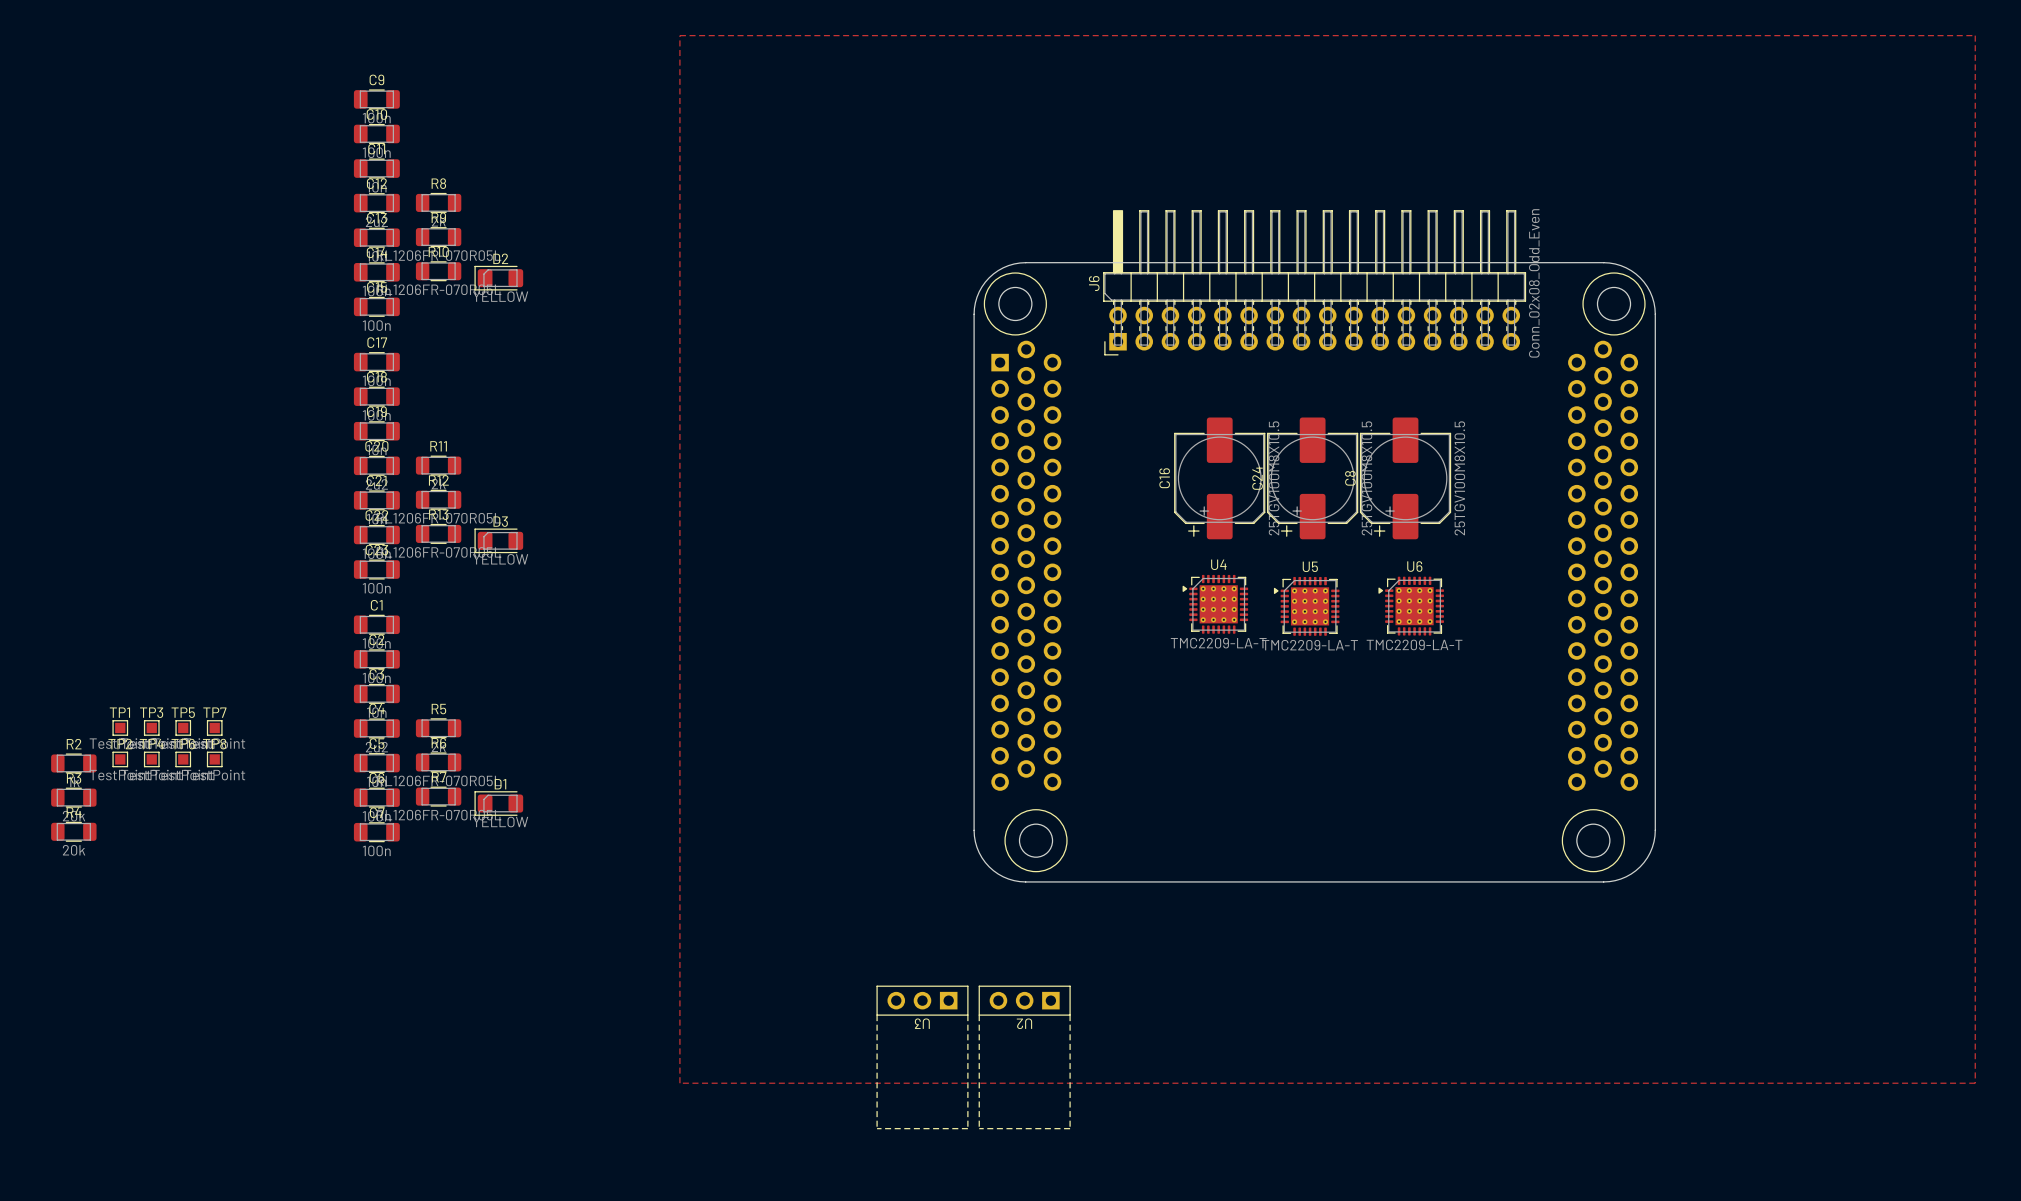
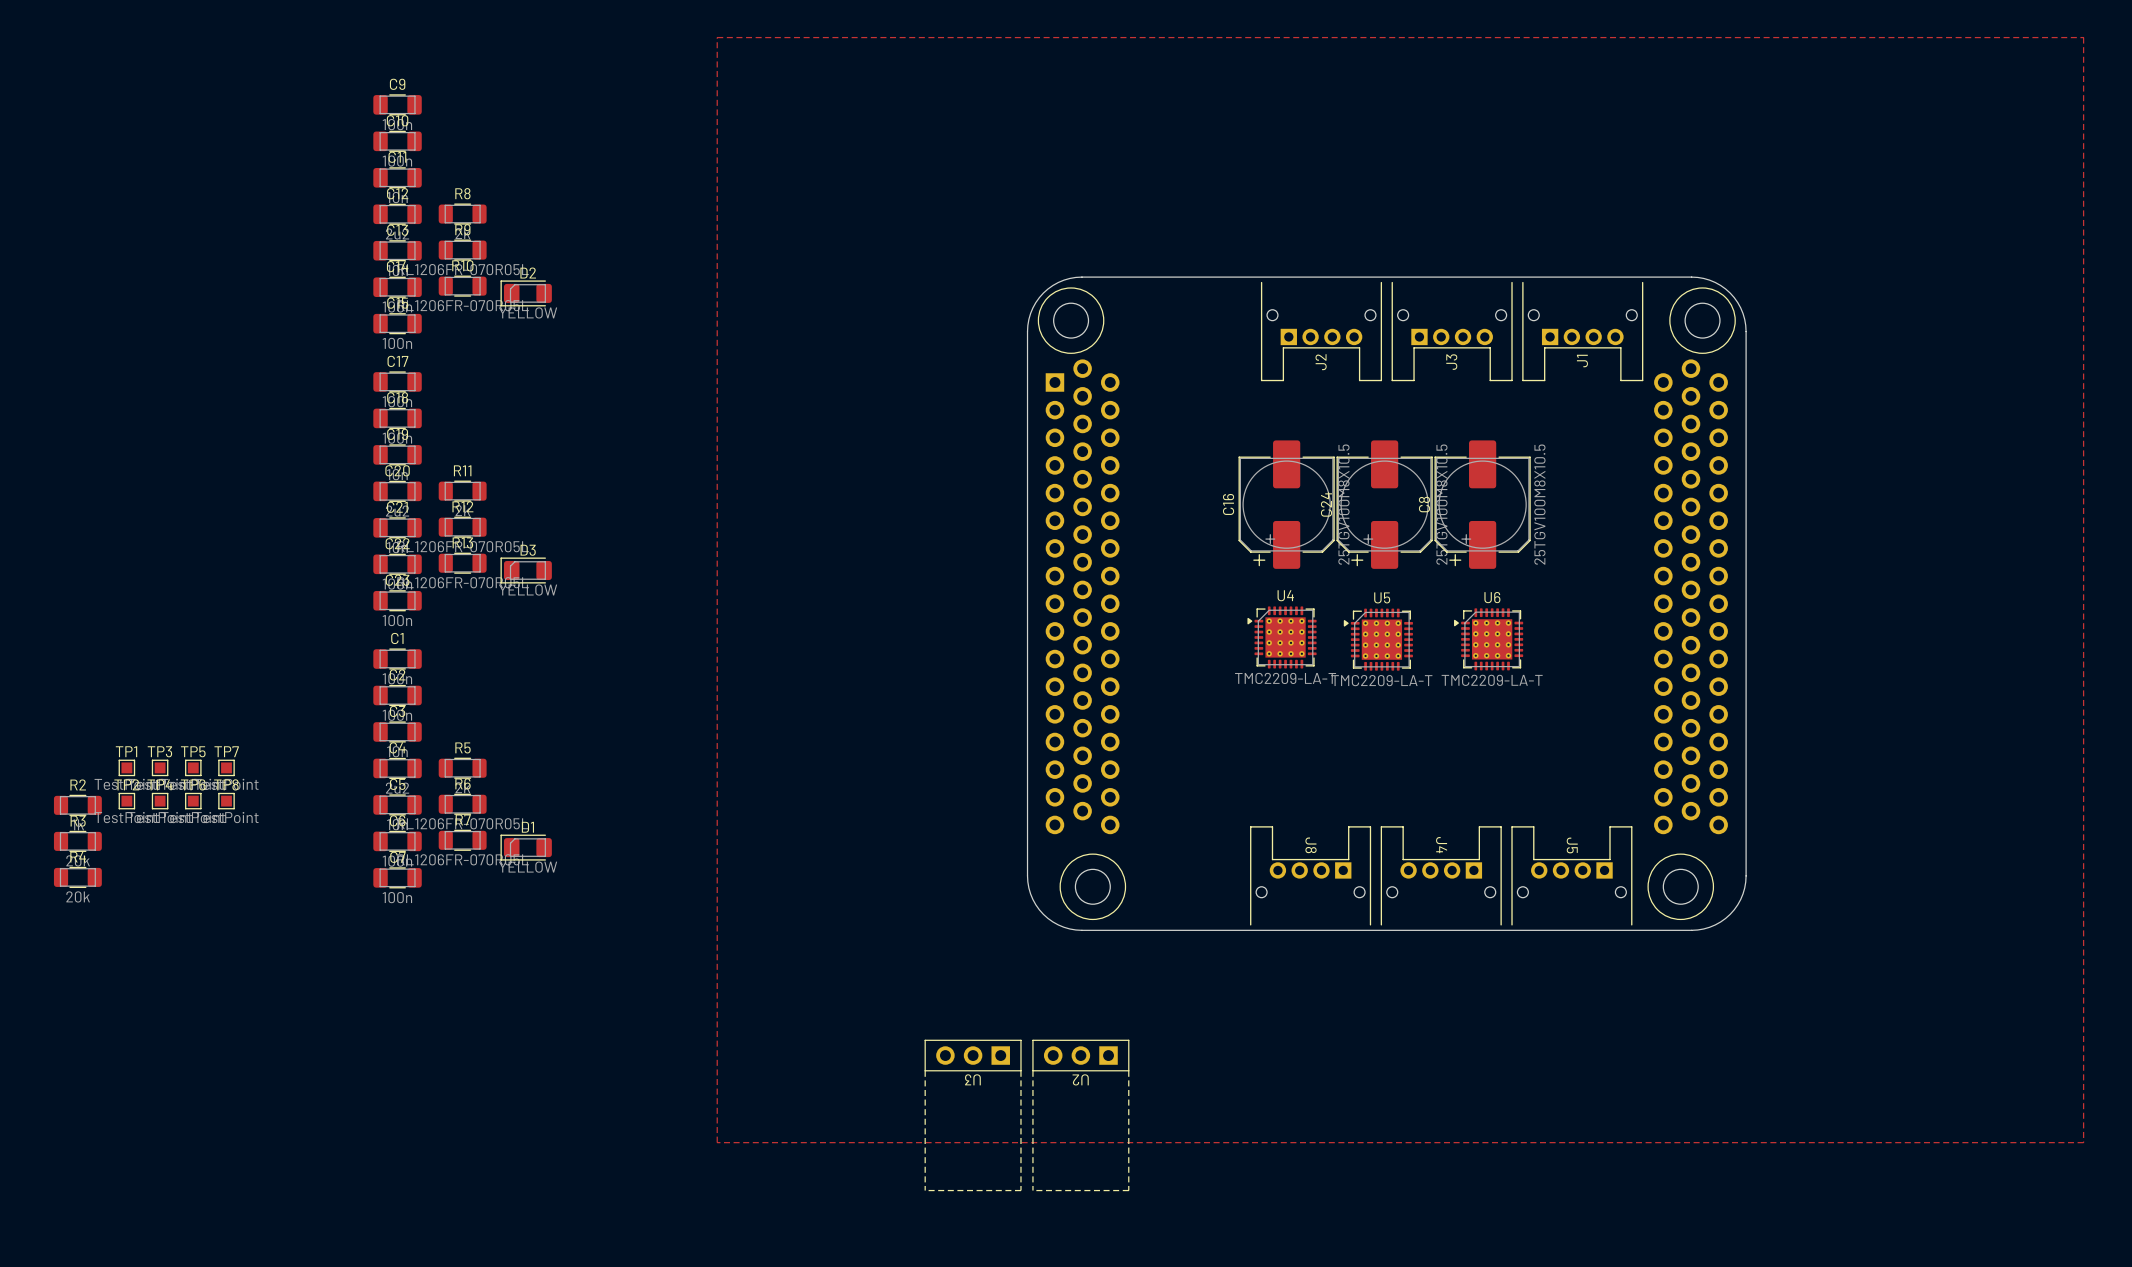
J6: Conn_02x08_Odd_Even (1314, 282) -> none
J2: none -> (1321, 331)
J3: none -> (1452, 331)
J1: none -> (1582, 331)
J8: none -> (1310, 875)
J4: none -> (1441, 875)
J5: none -> (1571, 875)

